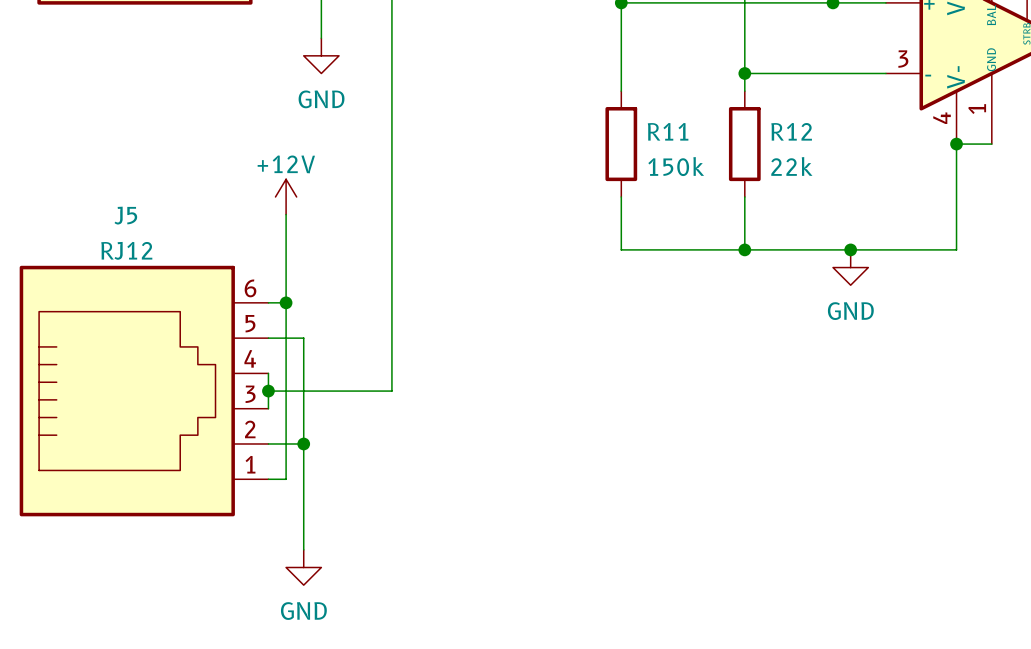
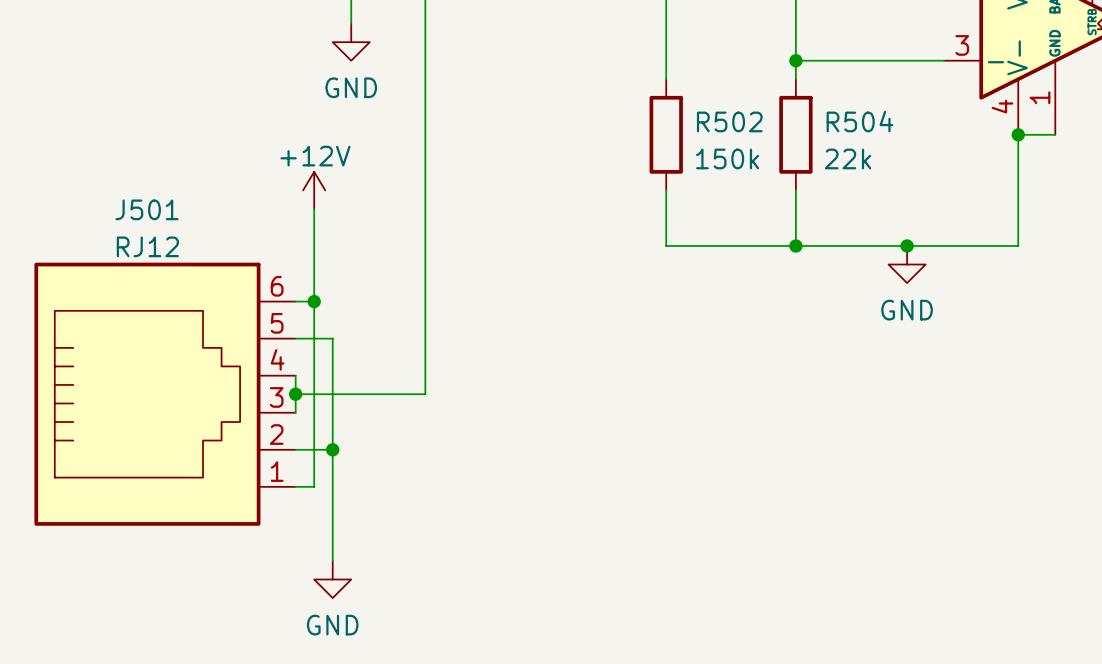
R11 name: R11 (668, 131) -> R502 (729, 121)
R12 name: R12 (791, 131) -> R504 (859, 121)
J5 name: J5 (125, 215) -> J501 (146, 209)

